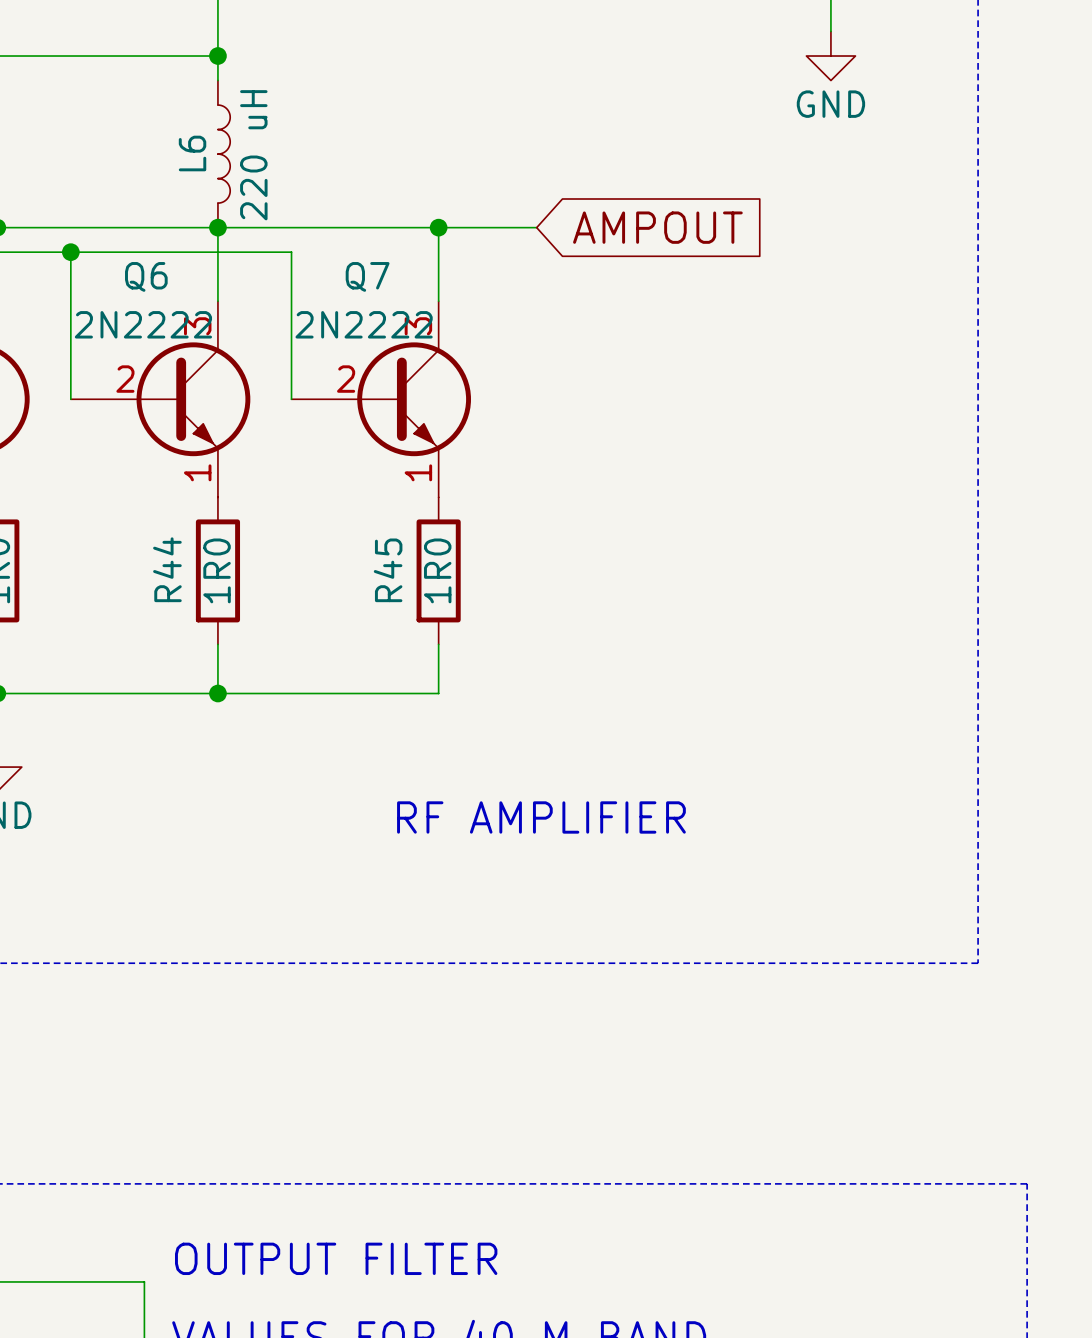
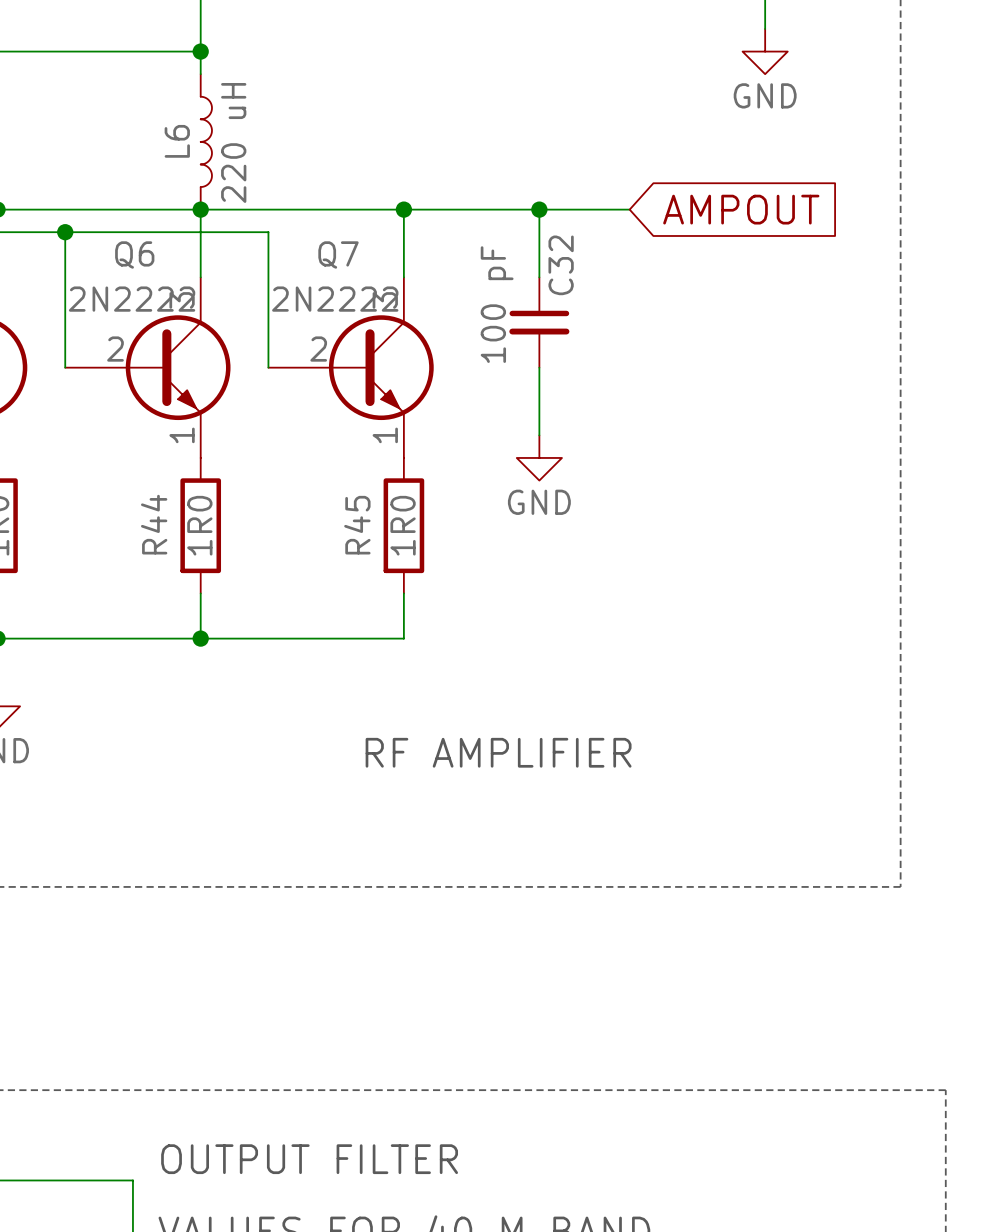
wire: none -> (494, 209) (629, 209)
wire: none -> (539, 209) (539, 277)
junction: none -> (539, 209)
global label position: AMPOUT (657, 227) -> AMPOUT (741, 209)
C32: none -> 100 pF (539, 322)
wire: none -> (539, 367) (539, 435)
power symbol: none -> GND (539, 457)

